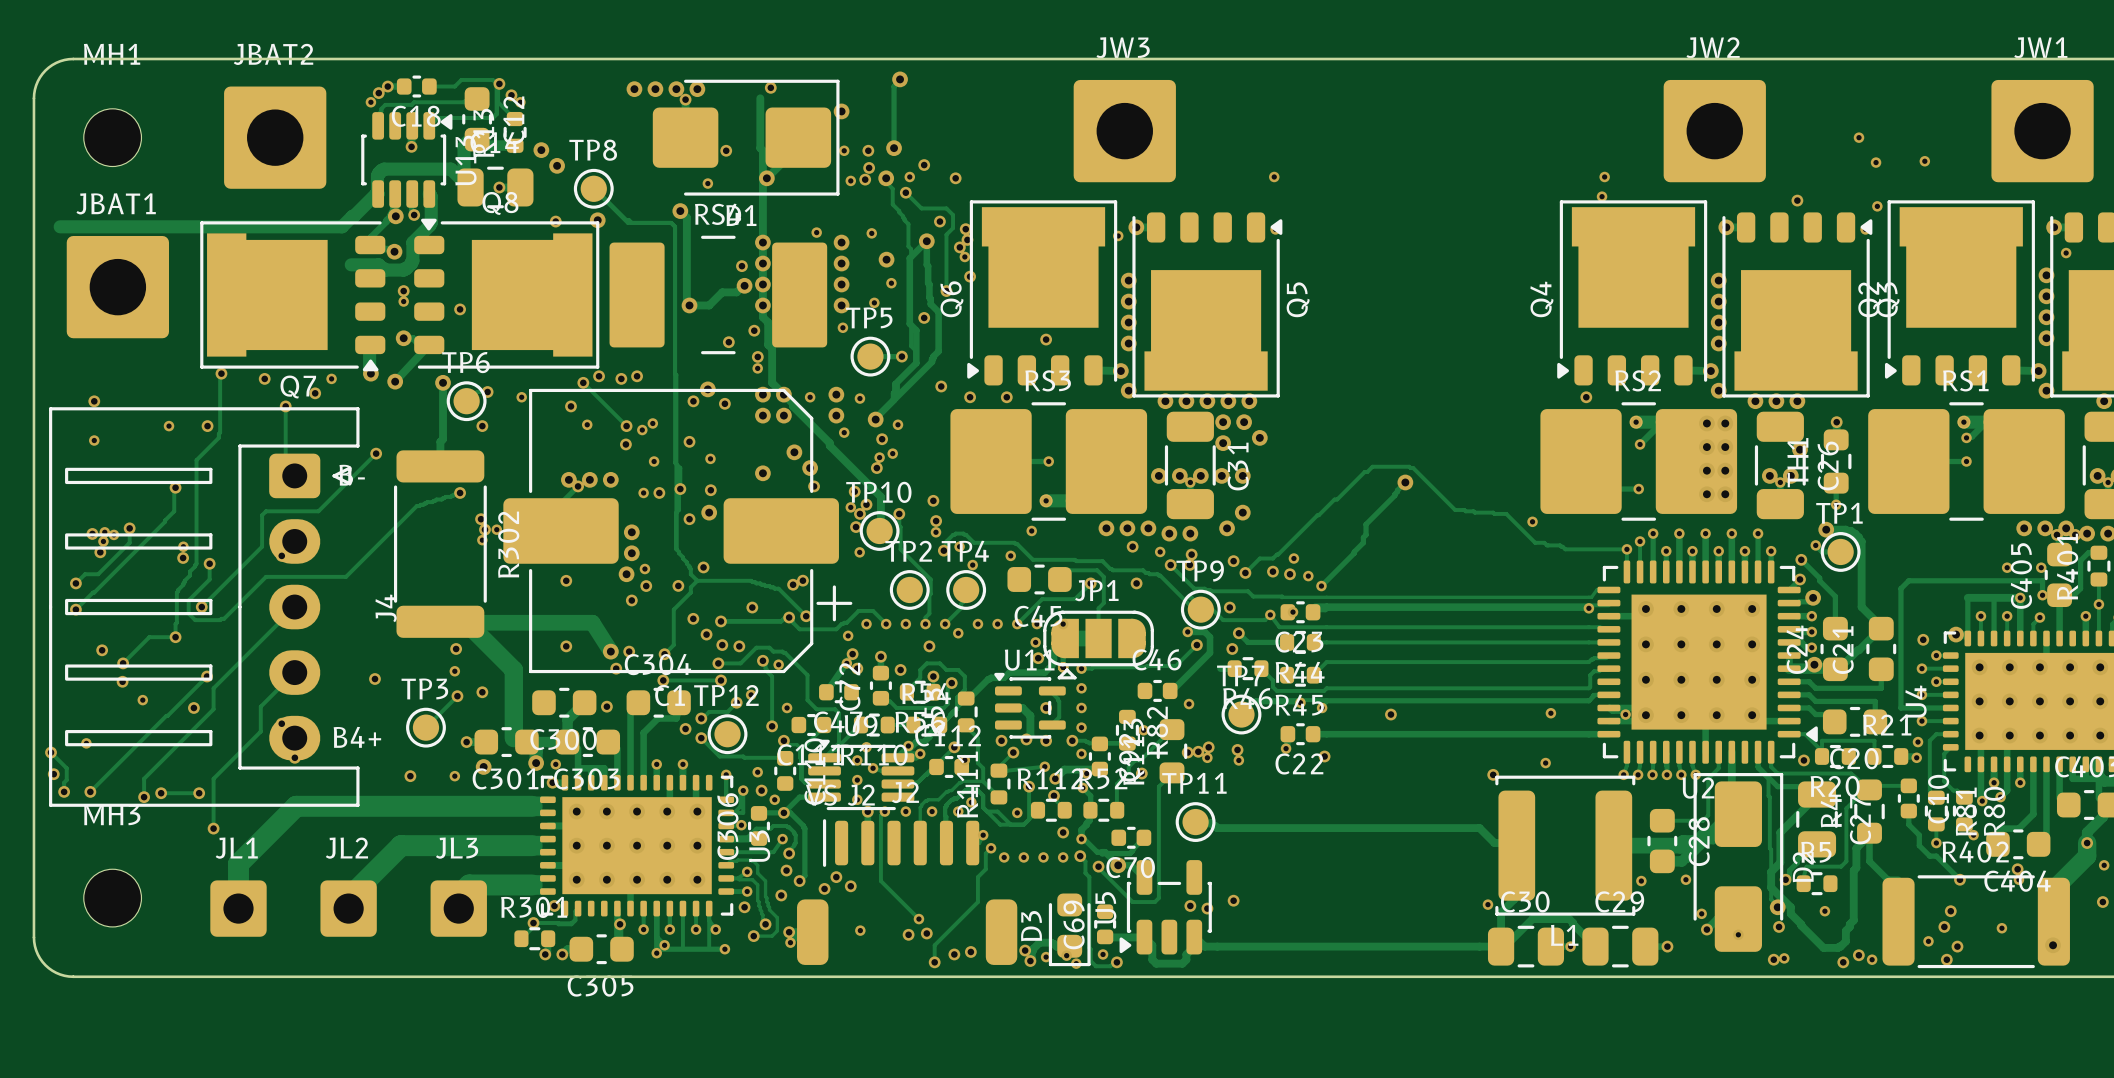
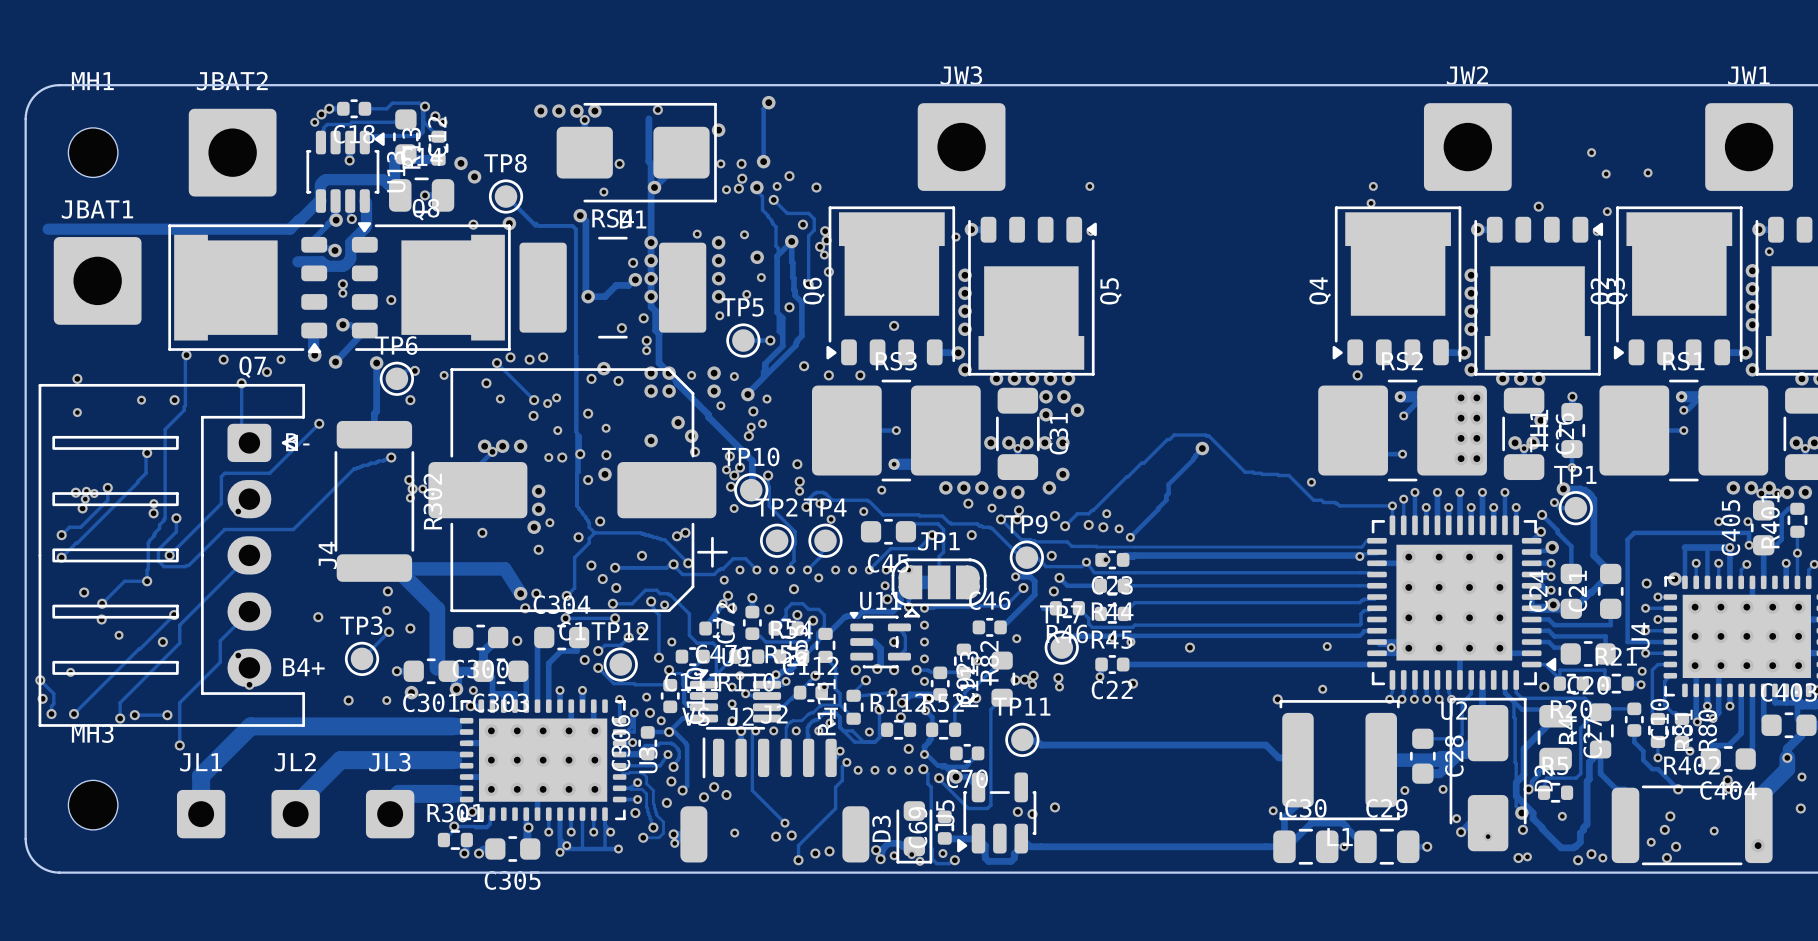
via: (646, 586) -> none
via: (566, 646) -> none
via: (739, 646) -> none

